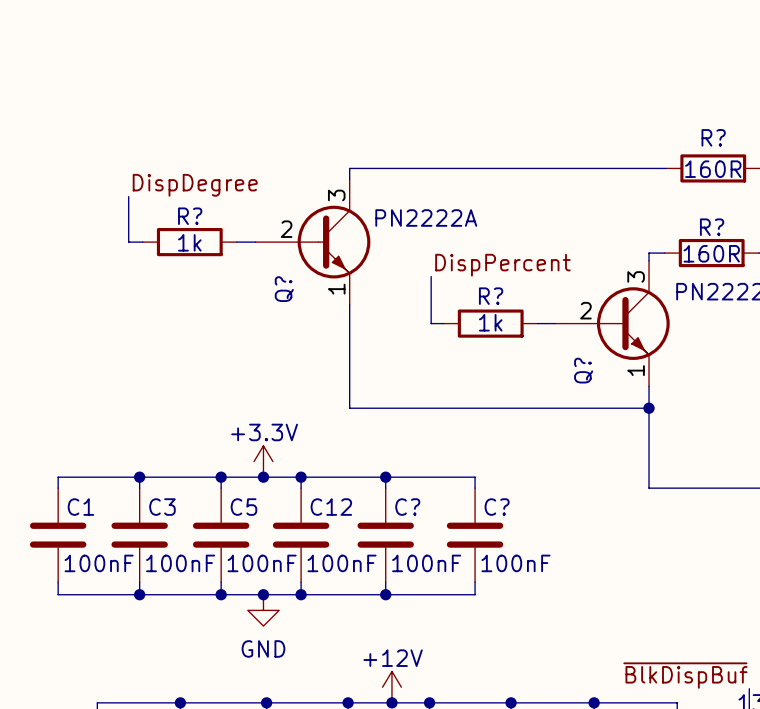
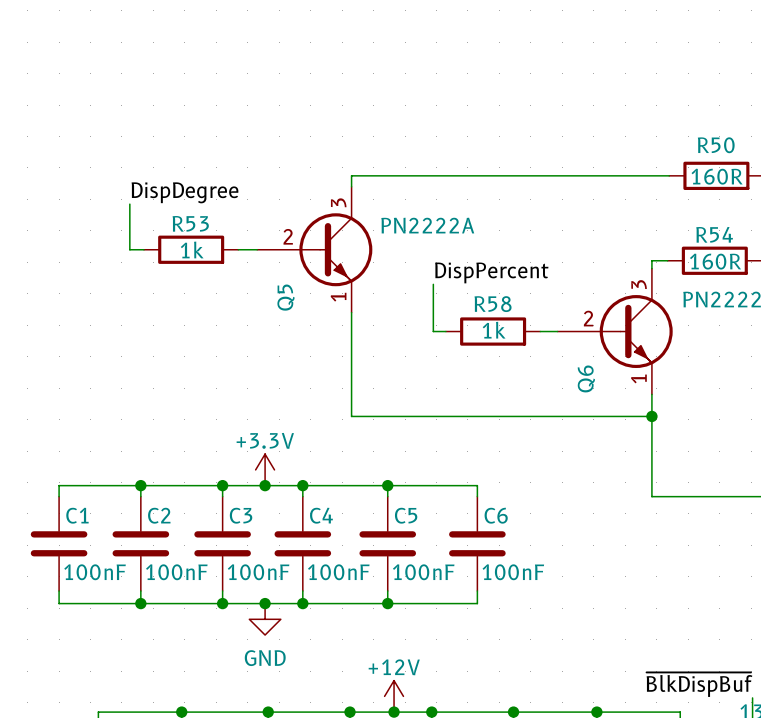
R? name: R? (713, 137) -> R50 (716, 145)
R? name: R? (190, 216) -> R53 (190, 223)
R? name: R? (712, 227) -> R54 (714, 234)
Q? name: Q? (284, 289) -> Q5 (285, 297)
R? name: R? (491, 296) -> R58 (493, 304)
Q? name: Q? (583, 370) -> Q6 (586, 378)
C3 name: C3 (162, 507) -> C2 (159, 515)
C5 name: C5 (243, 507) -> C3 (241, 515)
C12 name: C12 (331, 507) -> C4 (321, 515)
C? name: C? (407, 507) -> C5 (406, 515)
C? name: C? (497, 507) -> C6 (496, 515)

